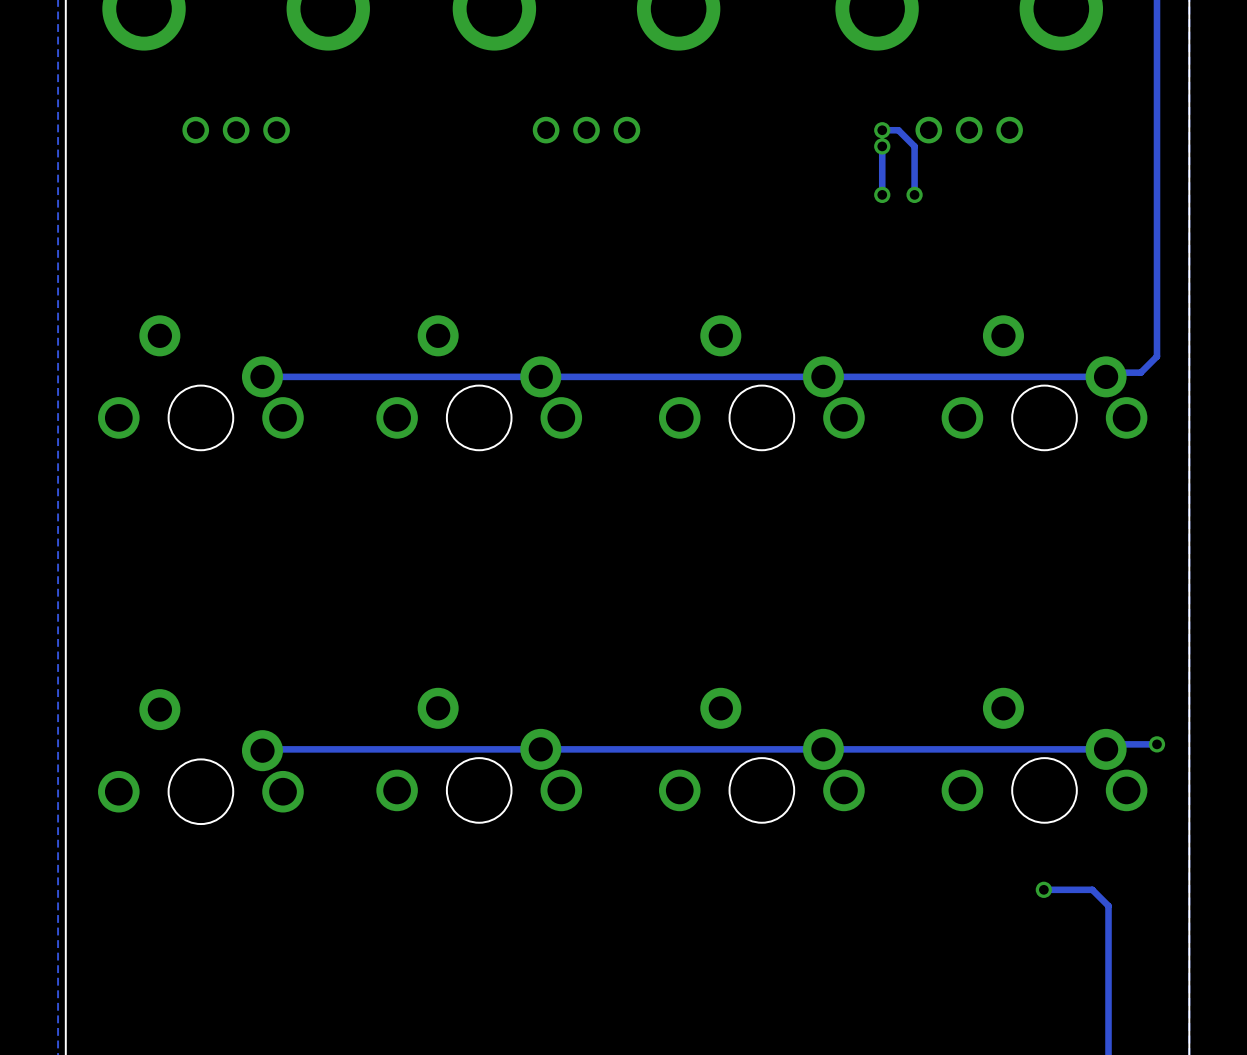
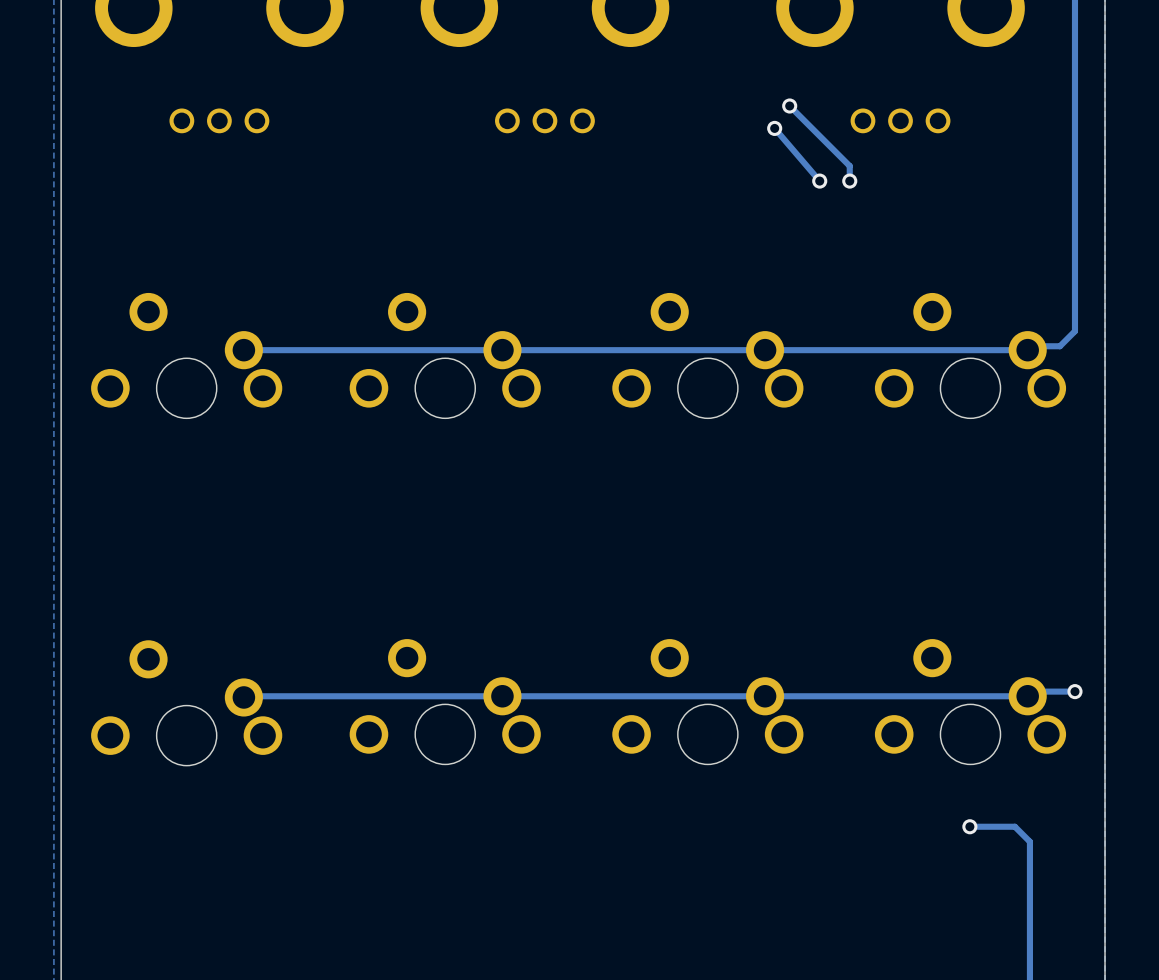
via: none -> (789, 106)
track: (882, 130) (898, 130) (914, 146) (914, 178) -> (789, 106) (849, 166)
via: (882, 130) -> none
via: none -> (774, 128)
track: (882, 146) (882, 194) -> (774, 128) (819, 181)
via: (882, 146) -> none

